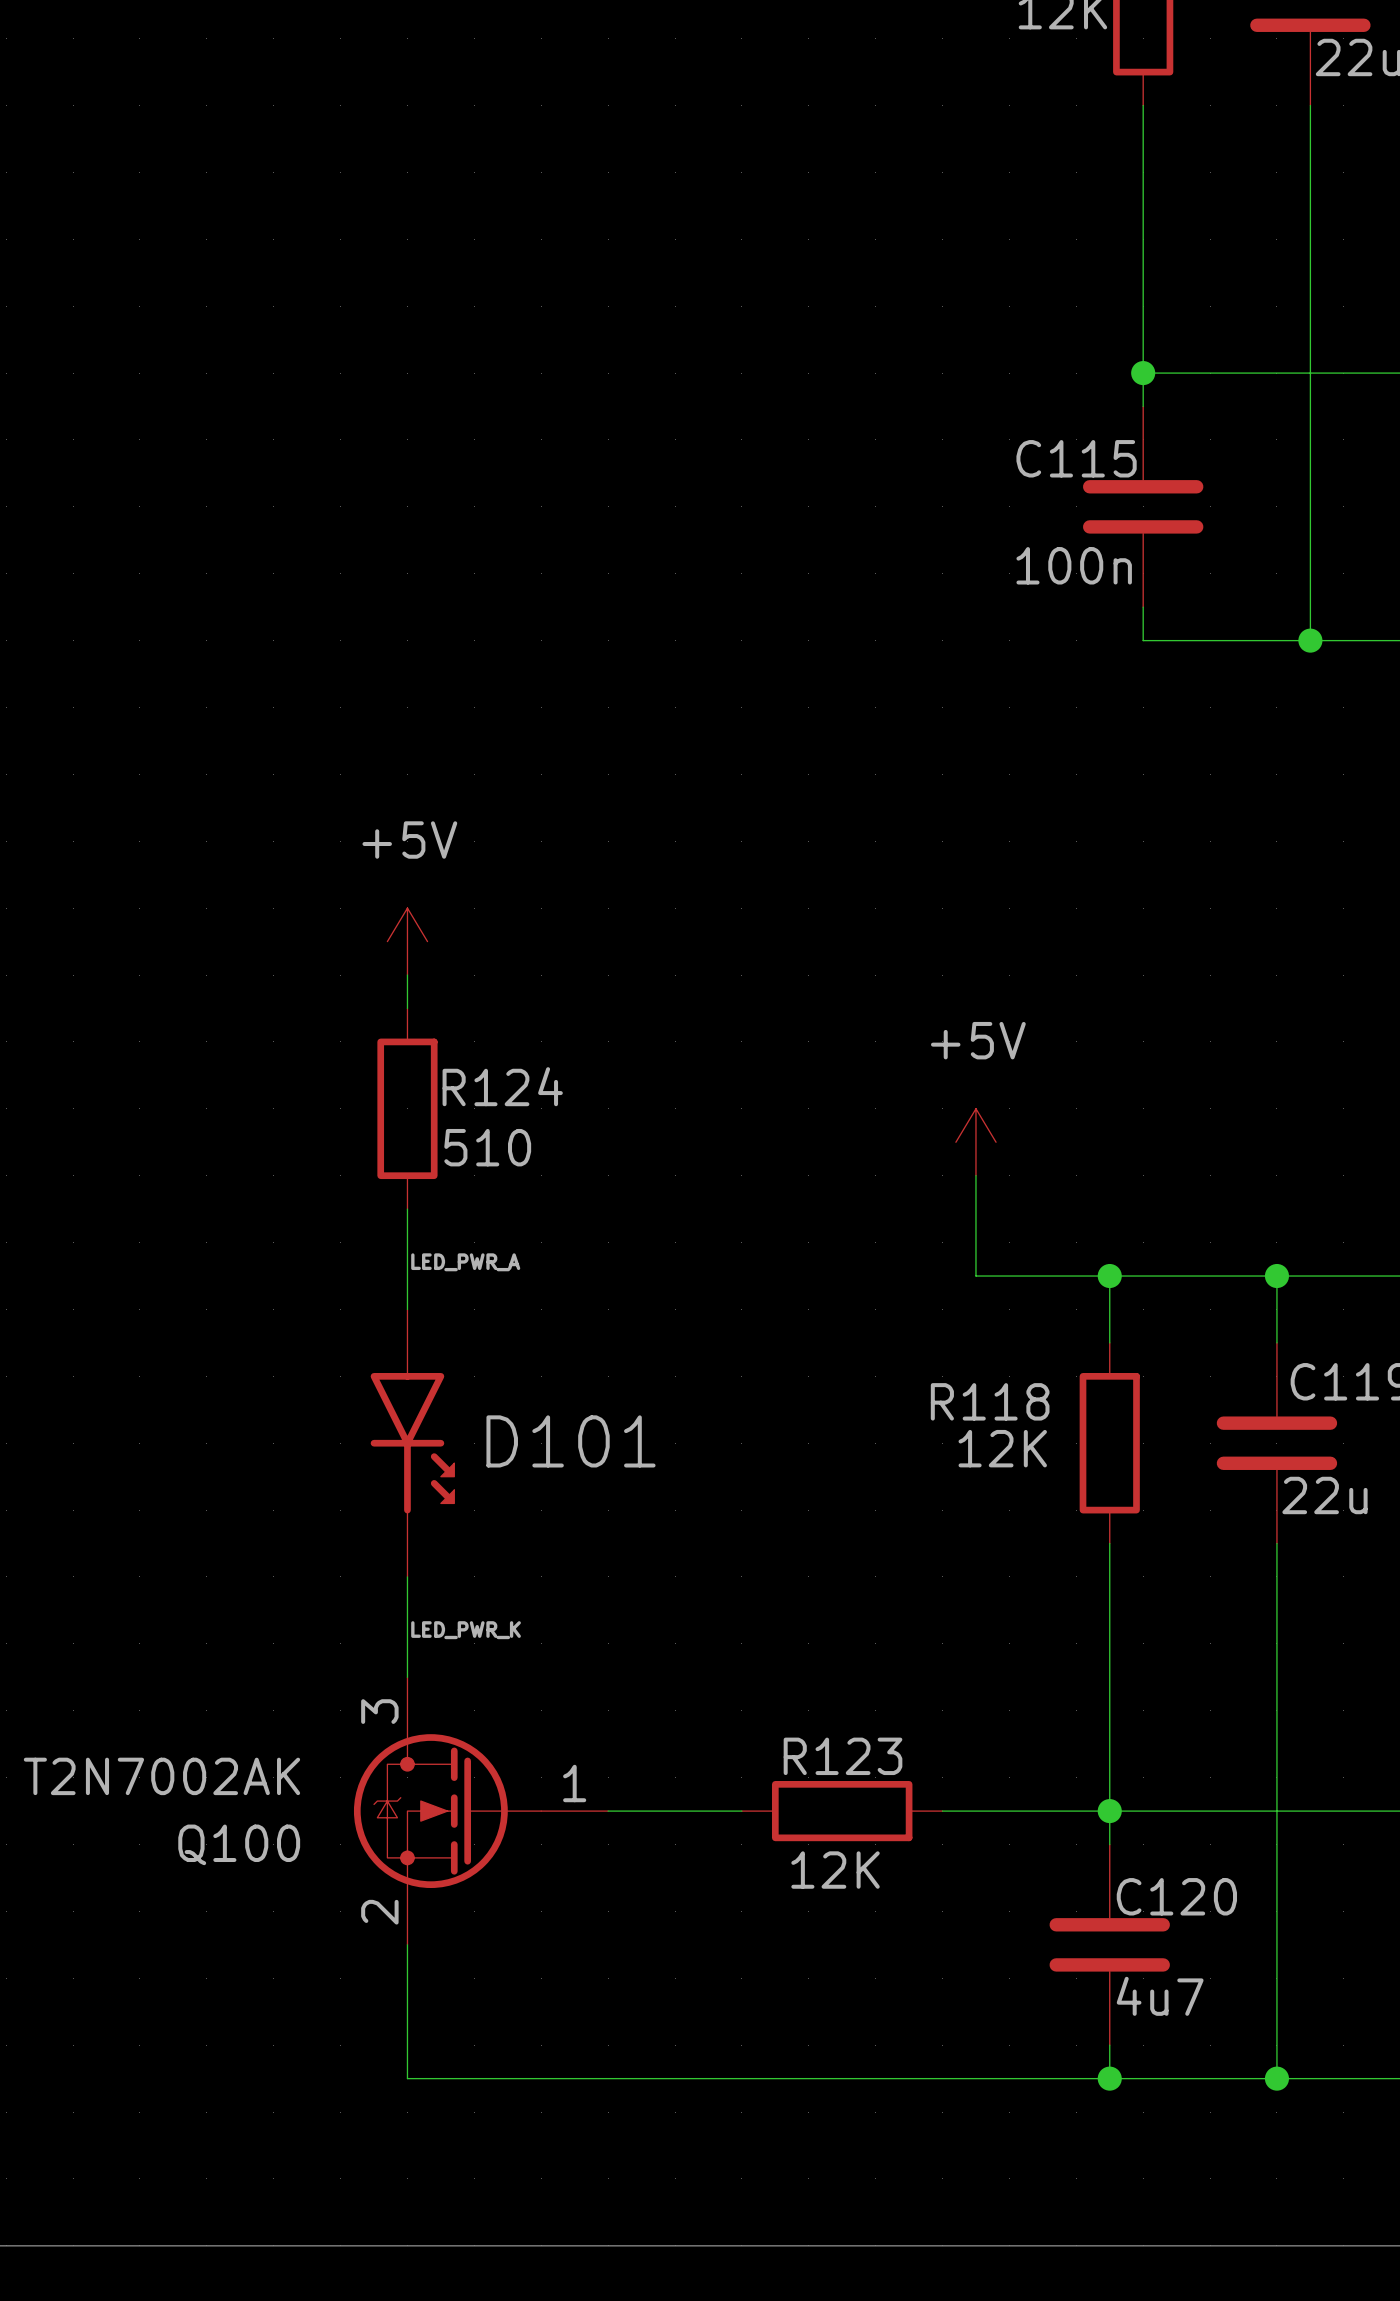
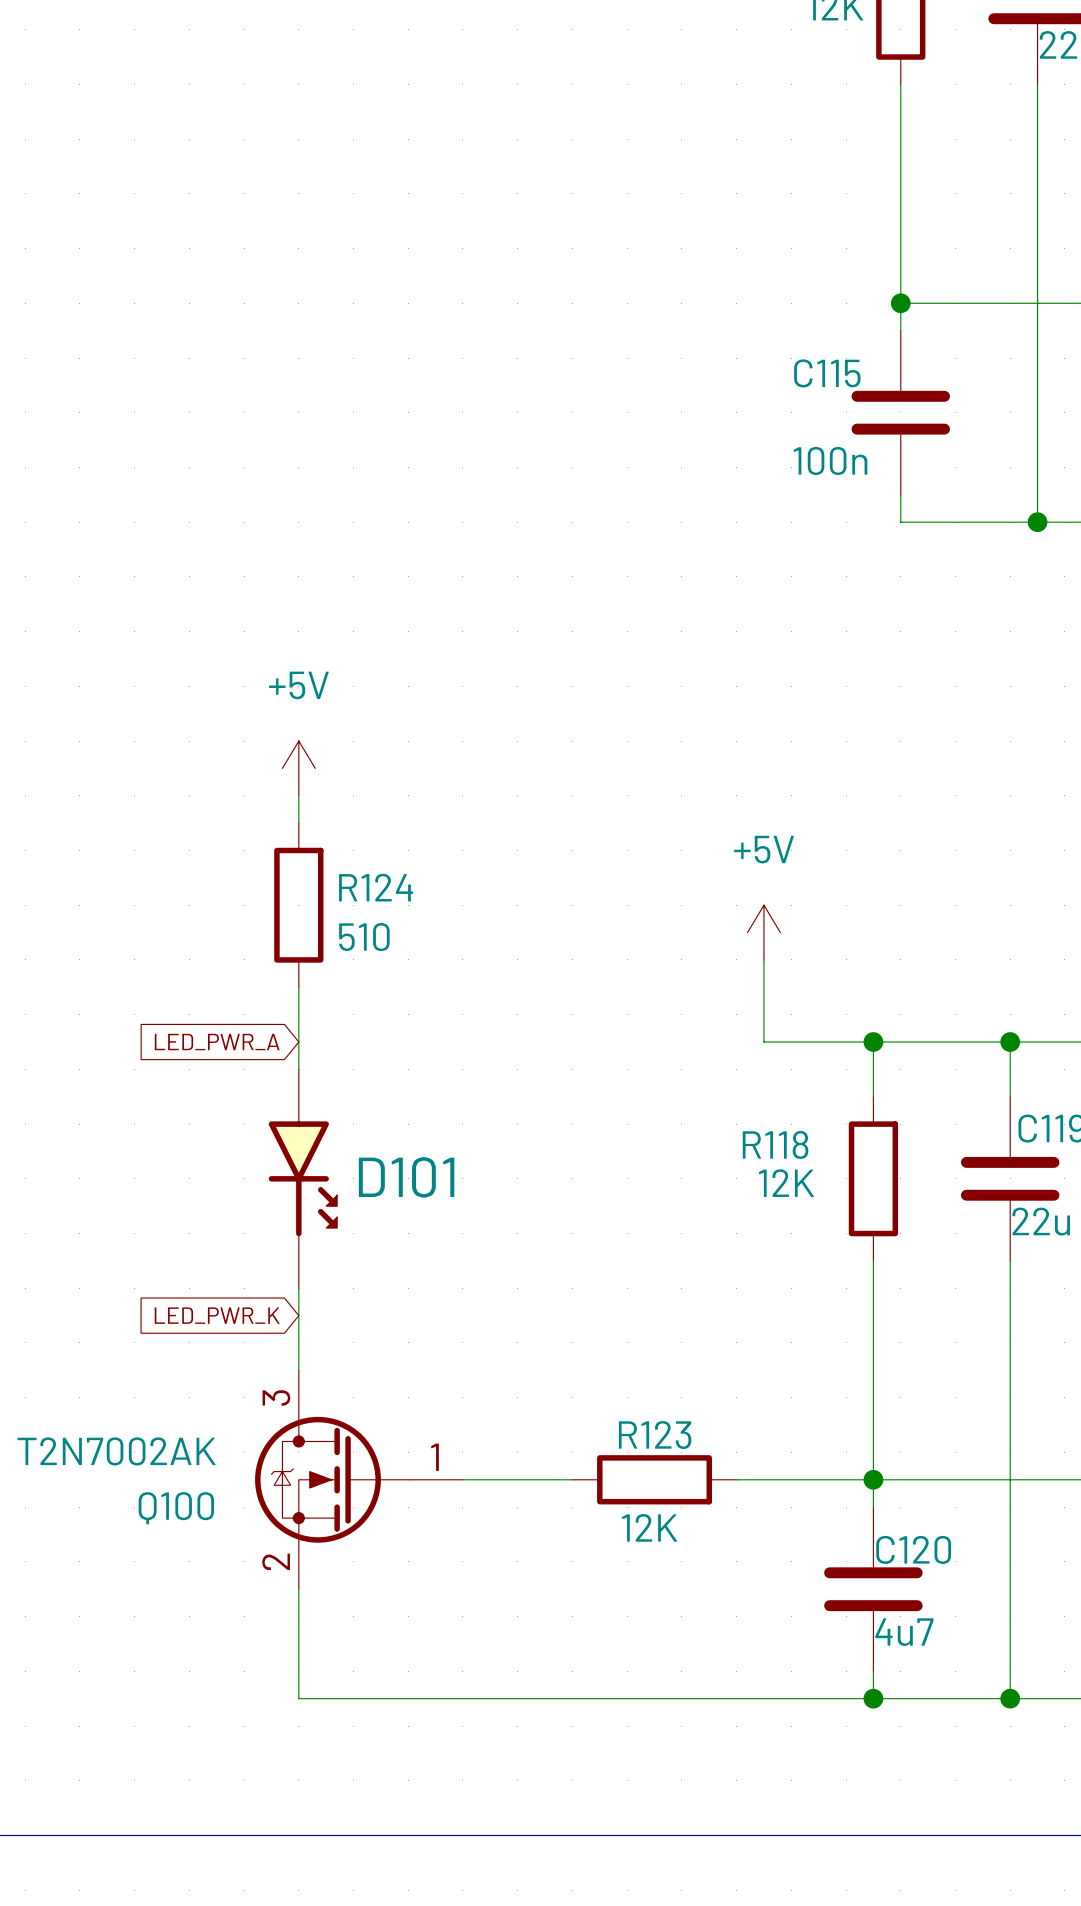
label: LED_PWR_A (465, 1262) -> none
global label: none -> LED_PWR_A (217, 1042)
global label: none -> LED_PWR_K (217, 1315)
label: LED_PWR_K (466, 1630) -> none

